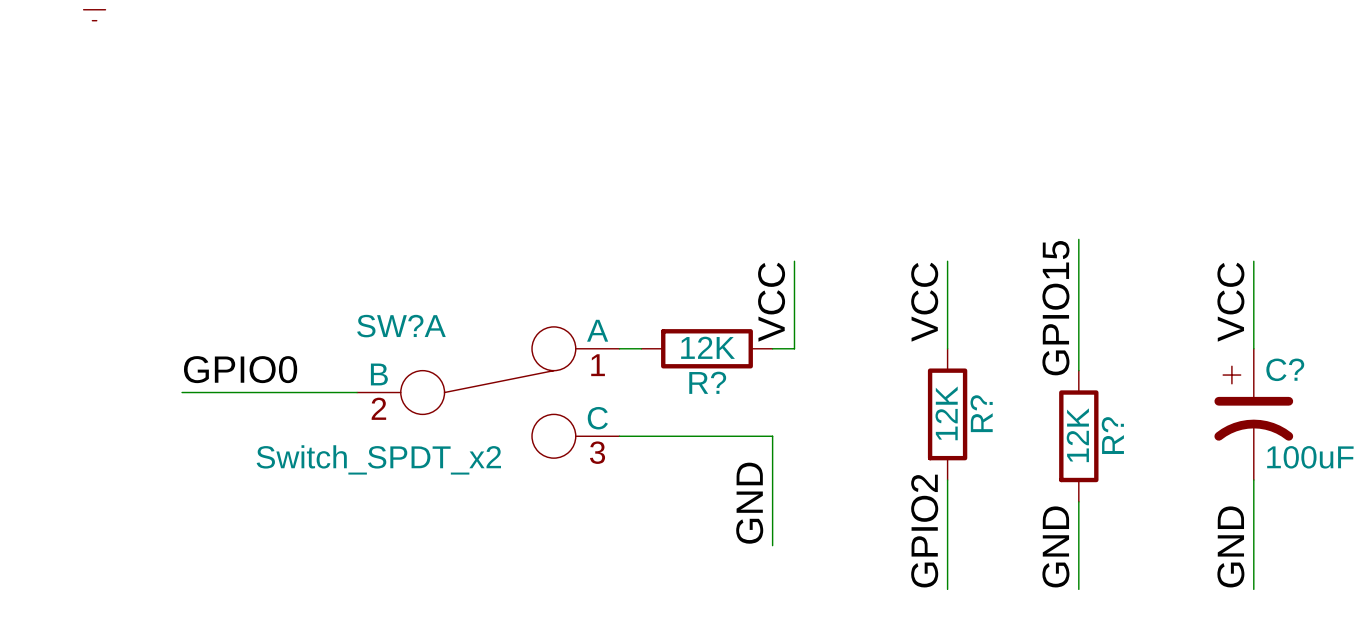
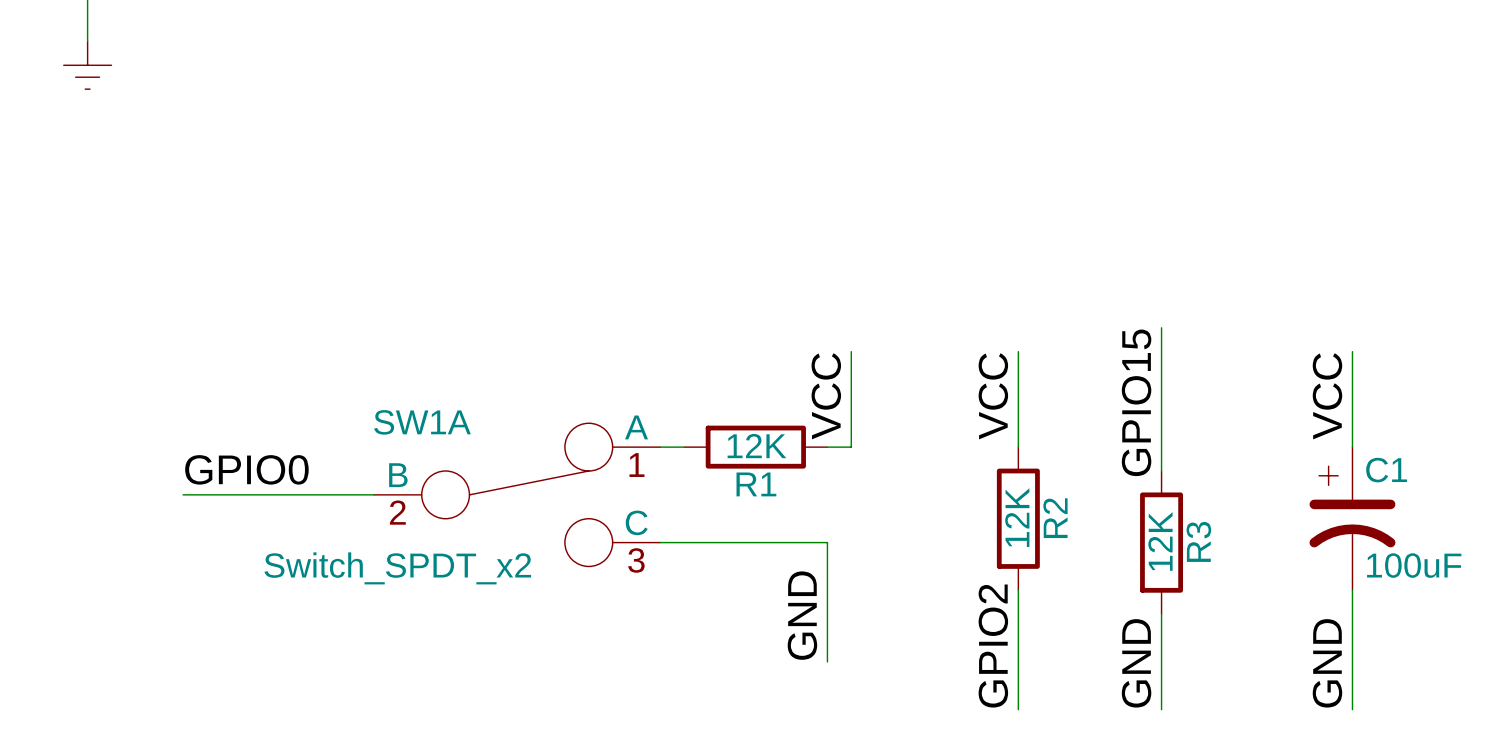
SW?A name: SW?A (401, 326) -> SW1A (422, 422)
C? name: C? (1285, 369) -> C1 (1386, 470)
R? name: R? (707, 382) -> R1 (756, 484)
R? name: R? (981, 413) -> R2 (1055, 518)
R? name: R? (1112, 435) -> R3 (1198, 541)

